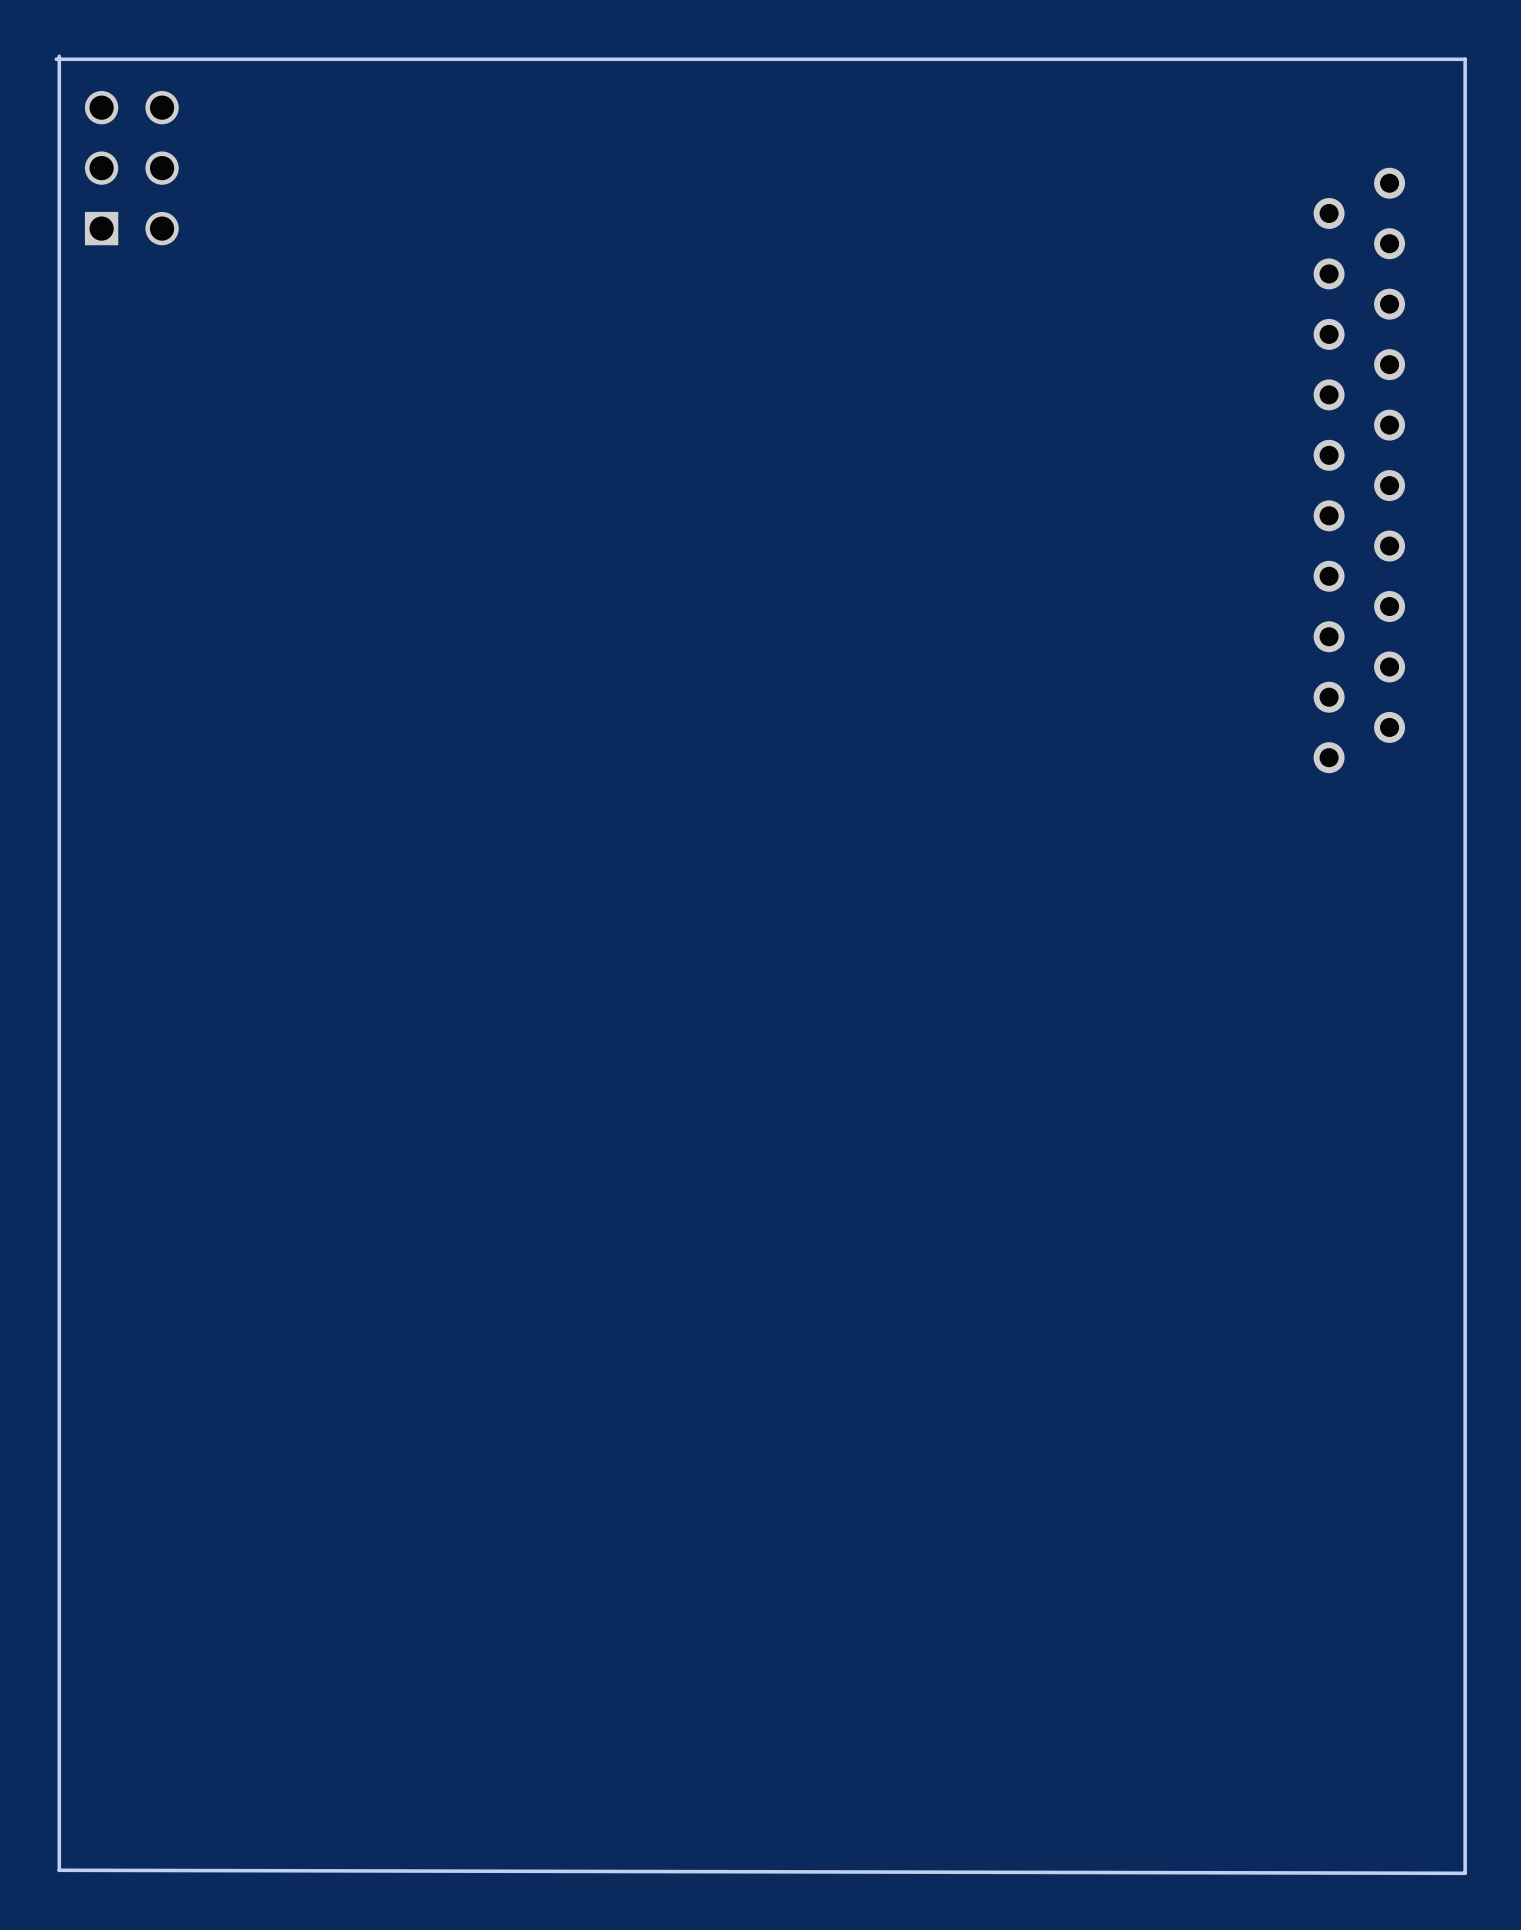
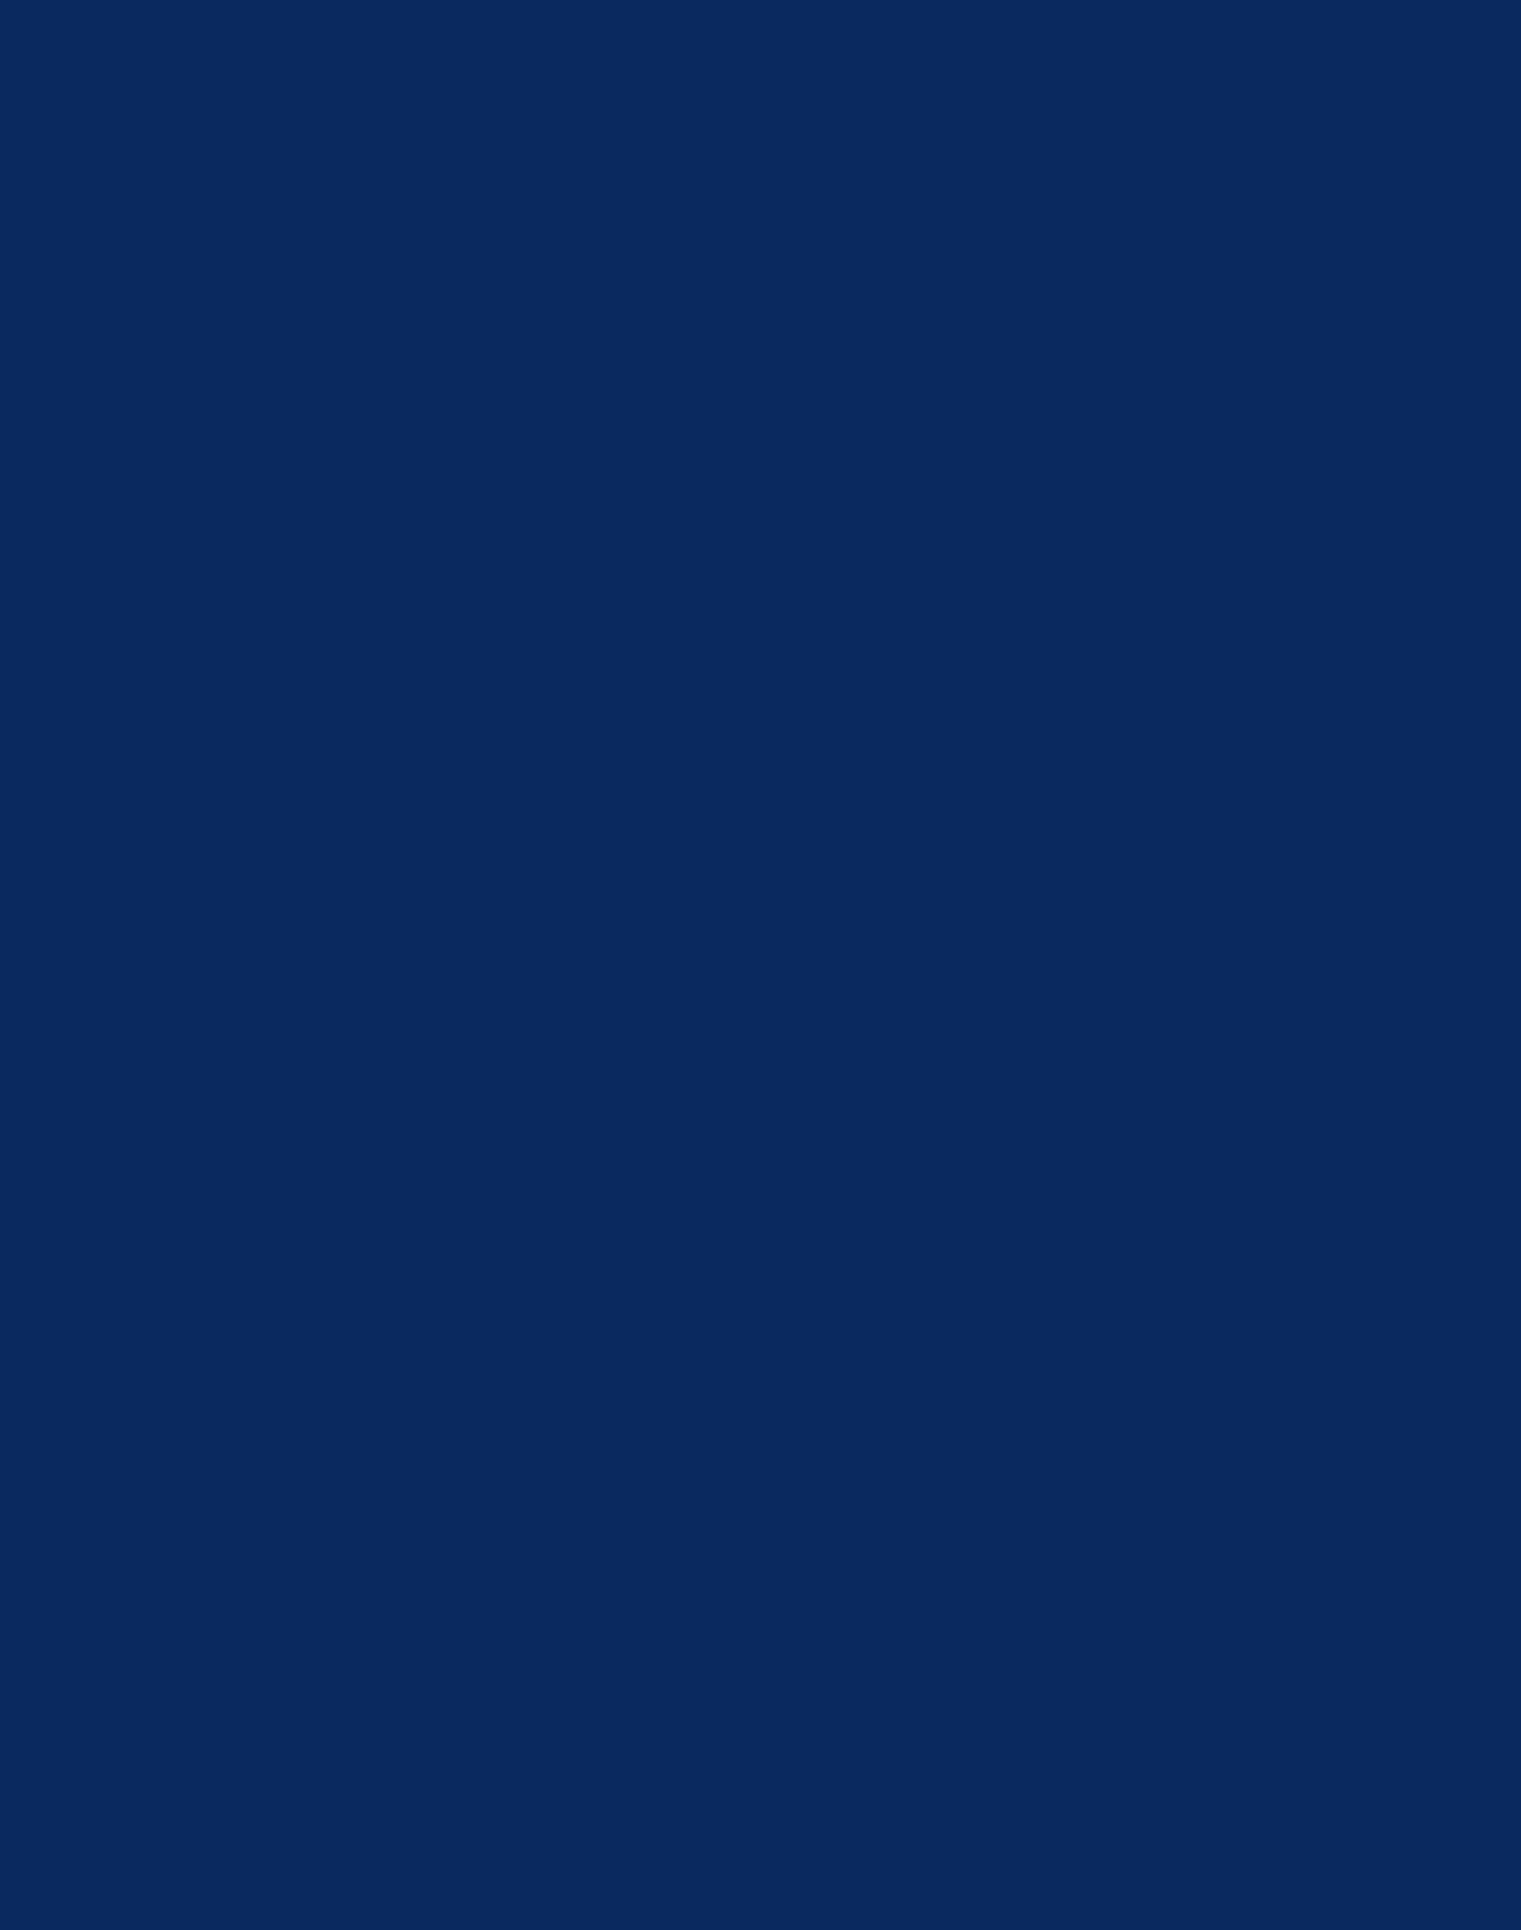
board edge: (59, 56) (59, 1870) (1465, 1873) (1465, 59) (56, 59) -> none
part: (131, 168) -> none
part: (1359, 470) -> none

